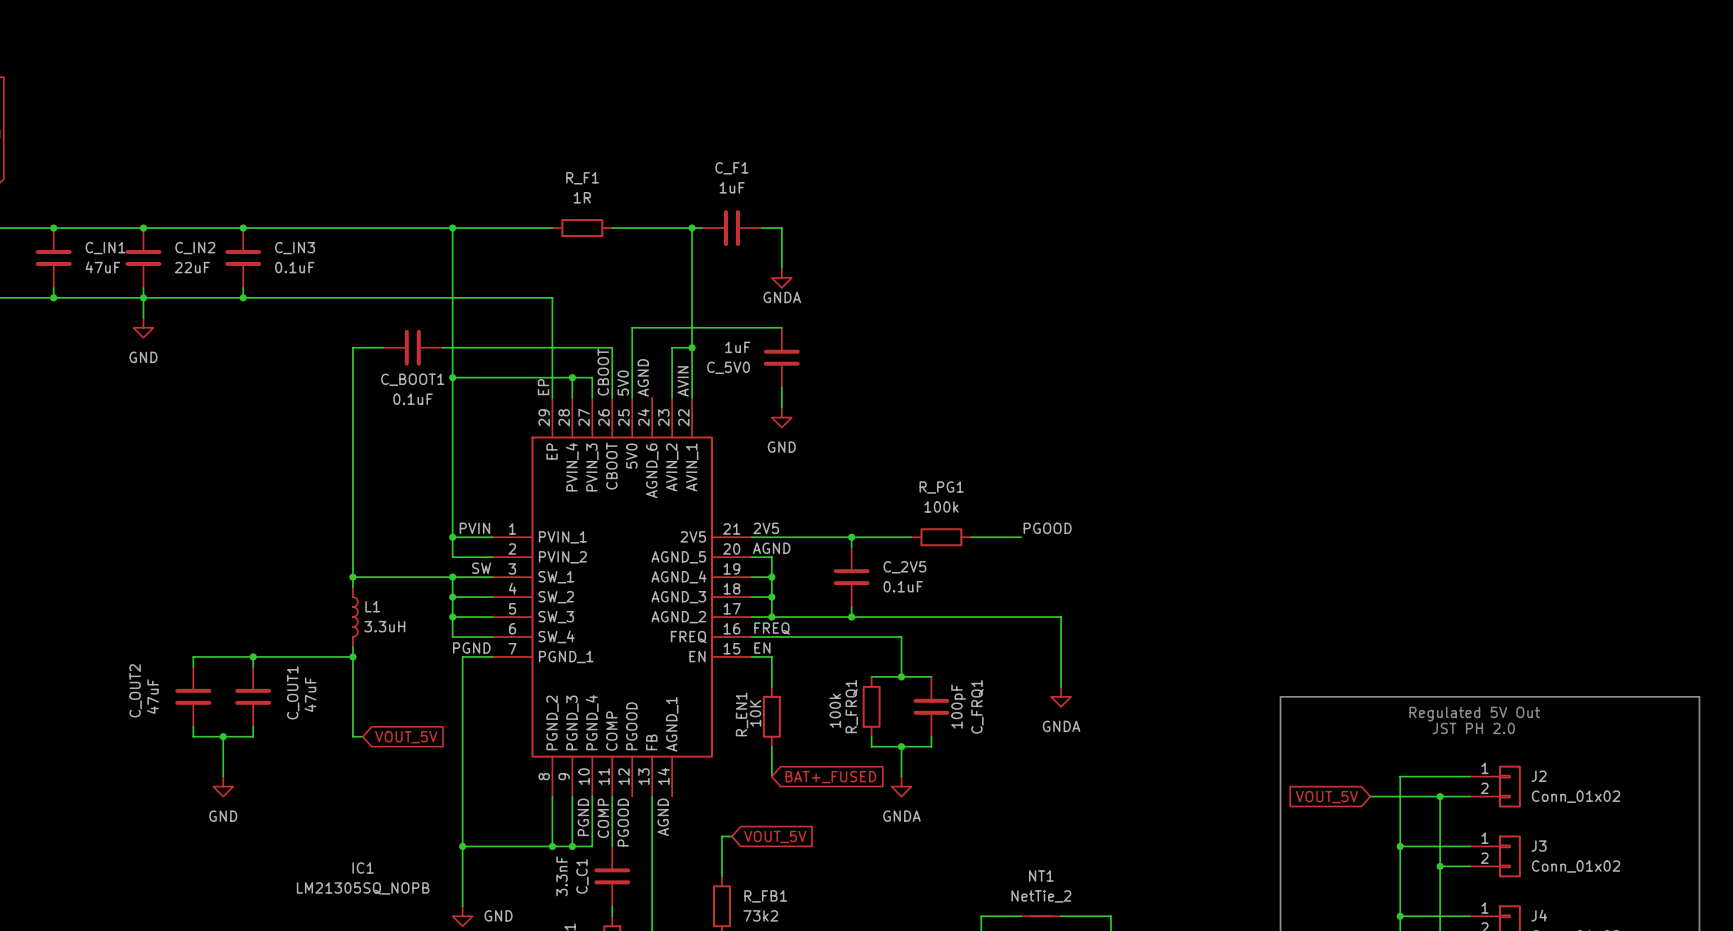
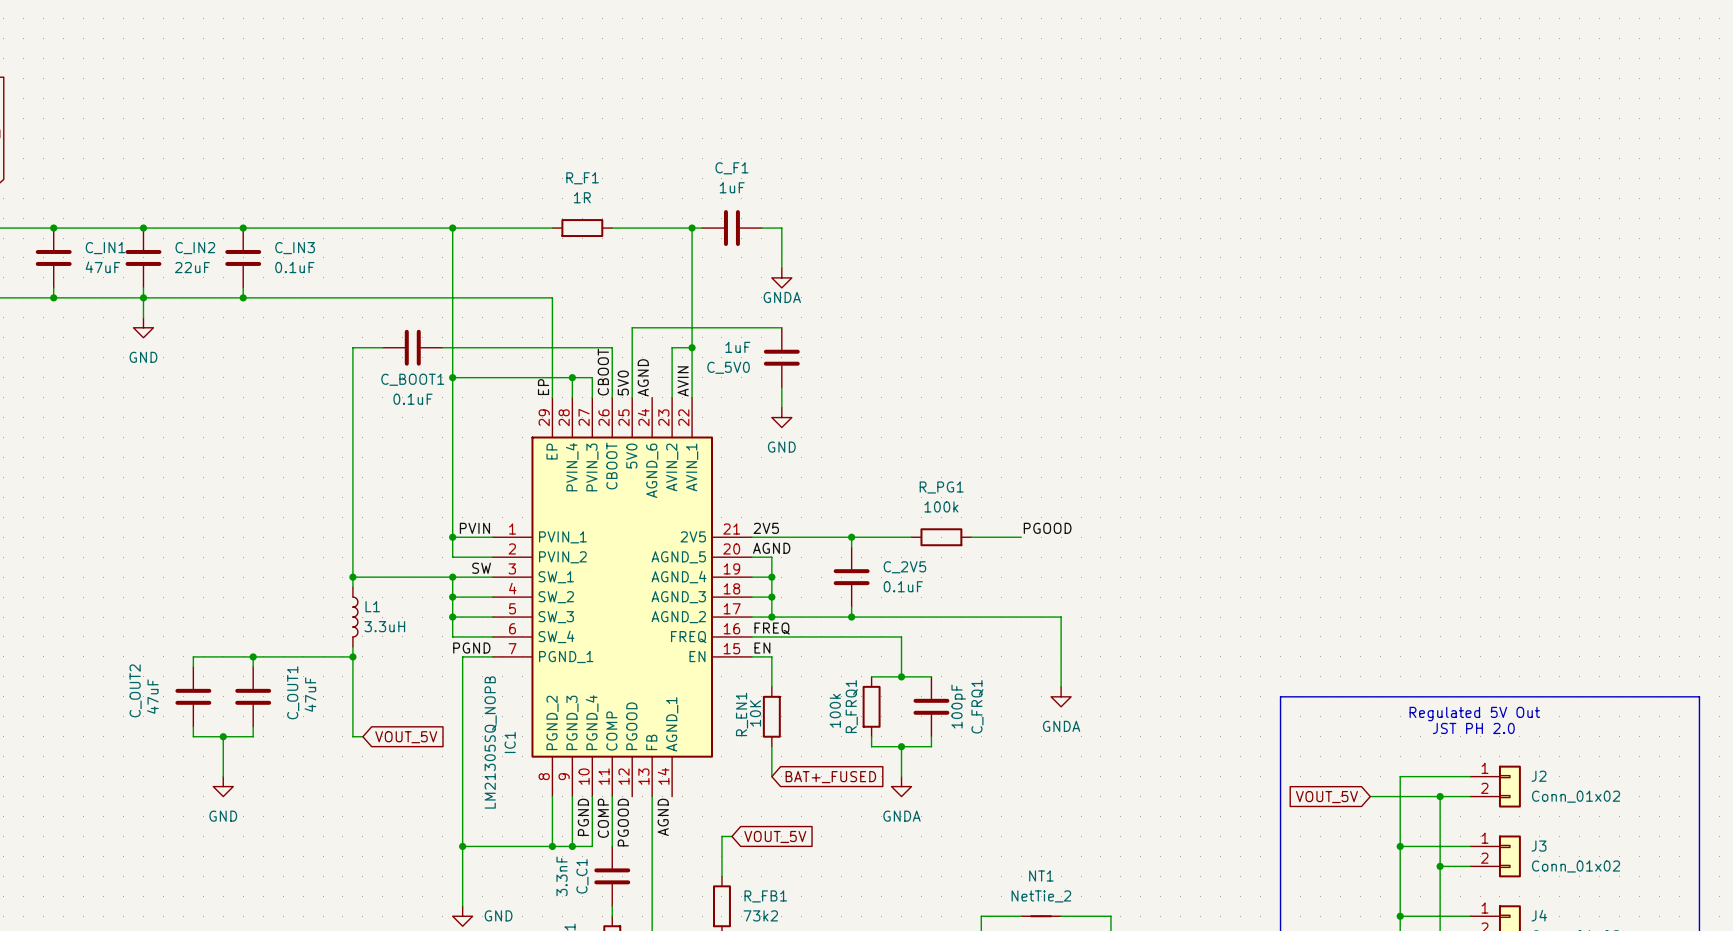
IC1 name rotation: 0° (363, 868) -> 90° counterclockwise (510, 742)
IC1 name position: IC1 (363, 868) -> IC1 (510, 742)
IC1 value rotation: 0° (363, 888) -> 90° counterclockwise (490, 742)
IC1 value position: LM21305SQ_NOPB (363, 888) -> LM21305SQ_NOPB (490, 742)

